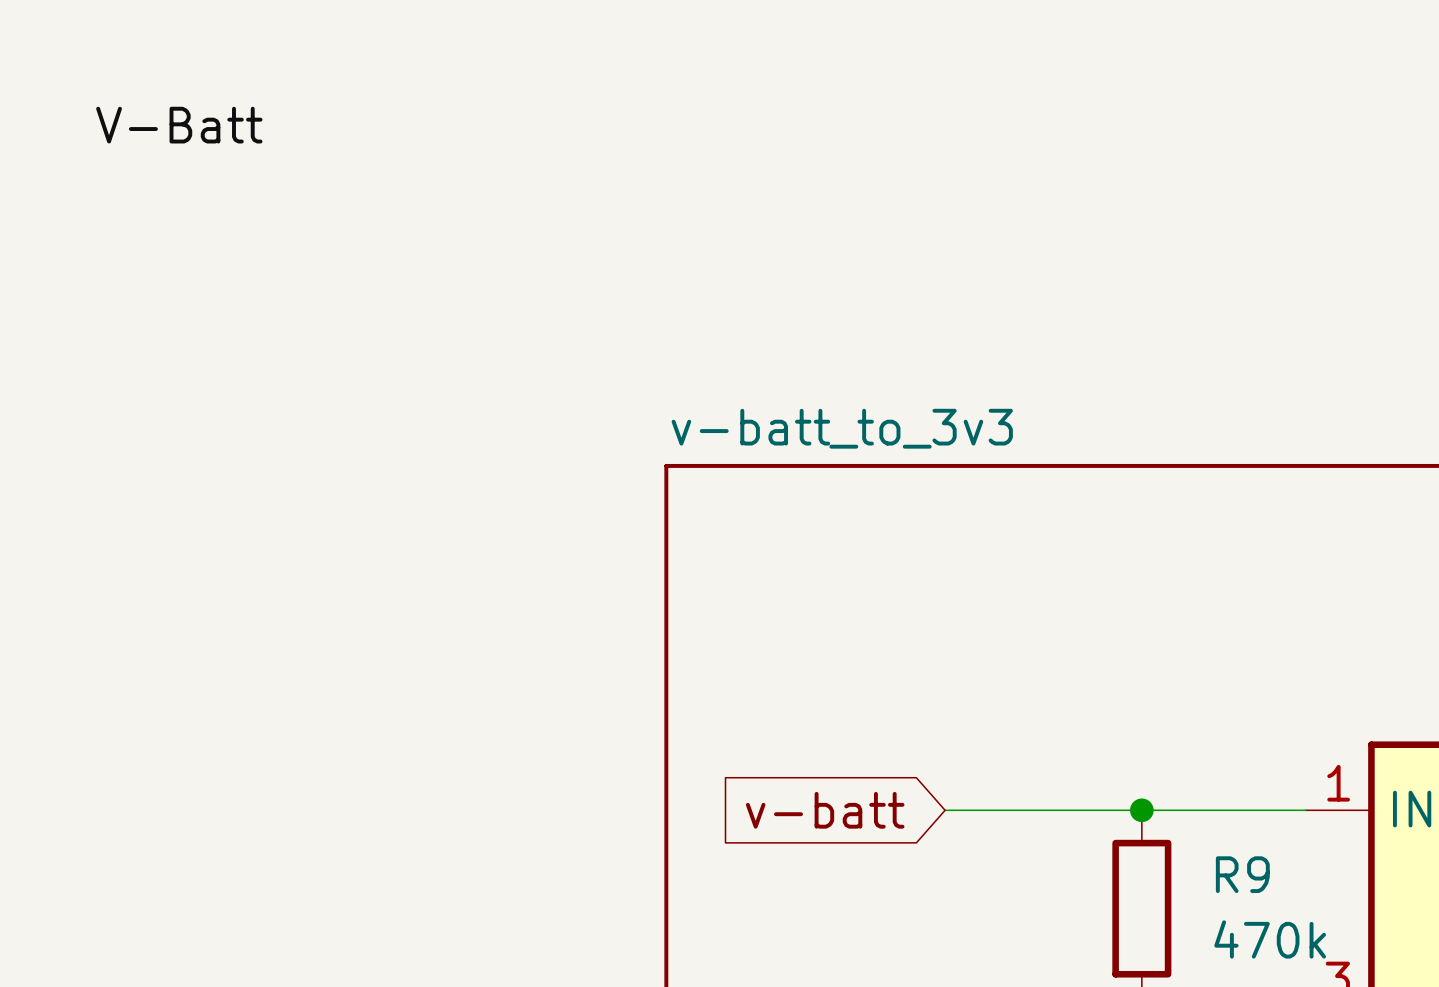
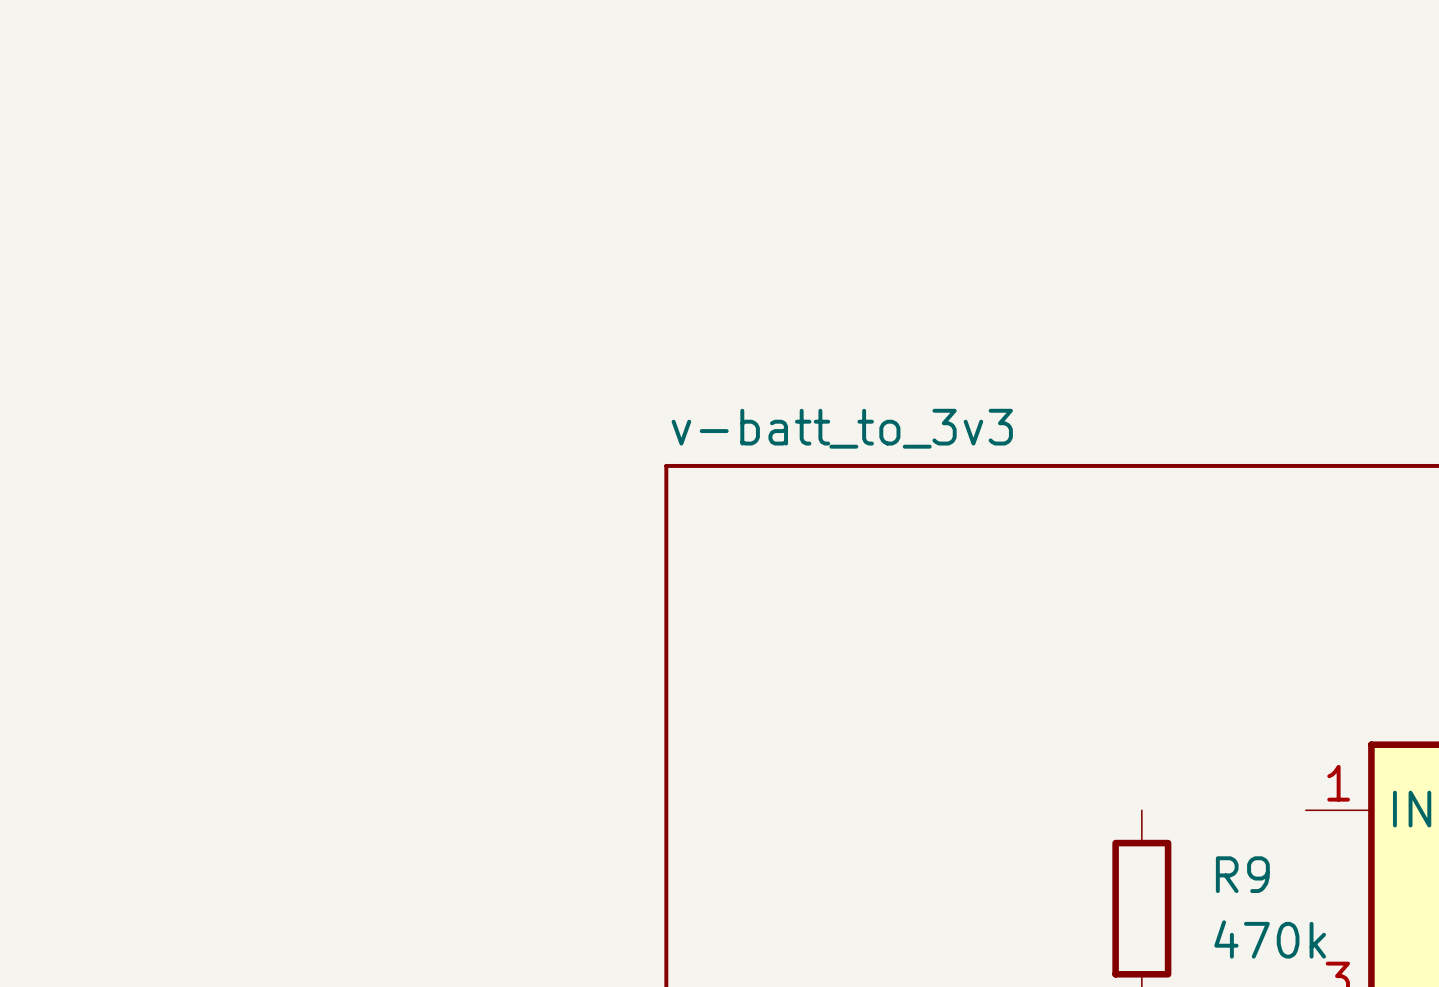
label: V-Batt (179, 125) -> none
global label: v-batt (825, 810) -> none
wire: (945, 810) (1305, 810) -> none
junction: (1141, 810) -> none

